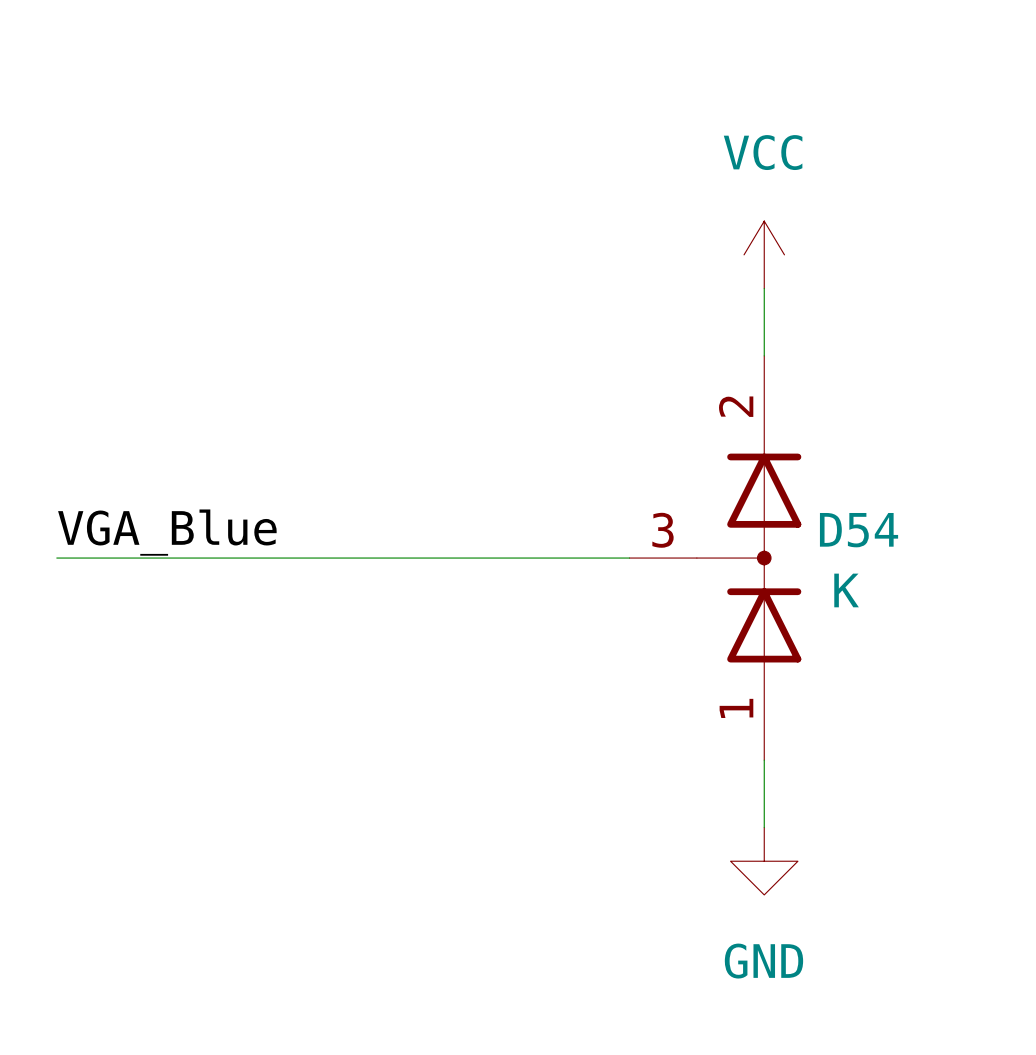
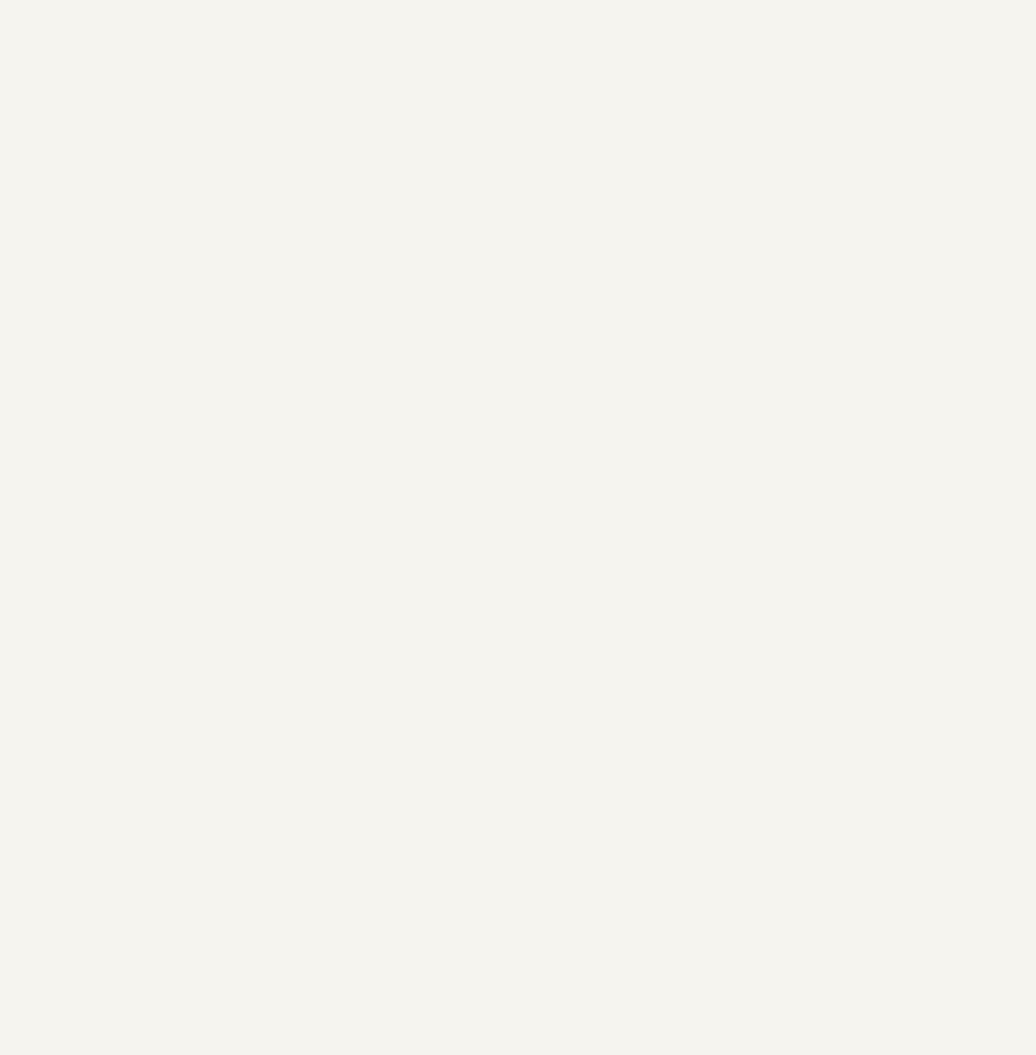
power symbol: VCC (764, 254) -> none
wire: (764, 288) (764, 355) -> none
label: VGA_Blue (167, 532) -> none
wire: (56, 558) (629, 558) -> none
D54: K (715, 558) -> none
wire: (764, 760) (764, 827) -> none
power symbol: GND (764, 861) -> none

